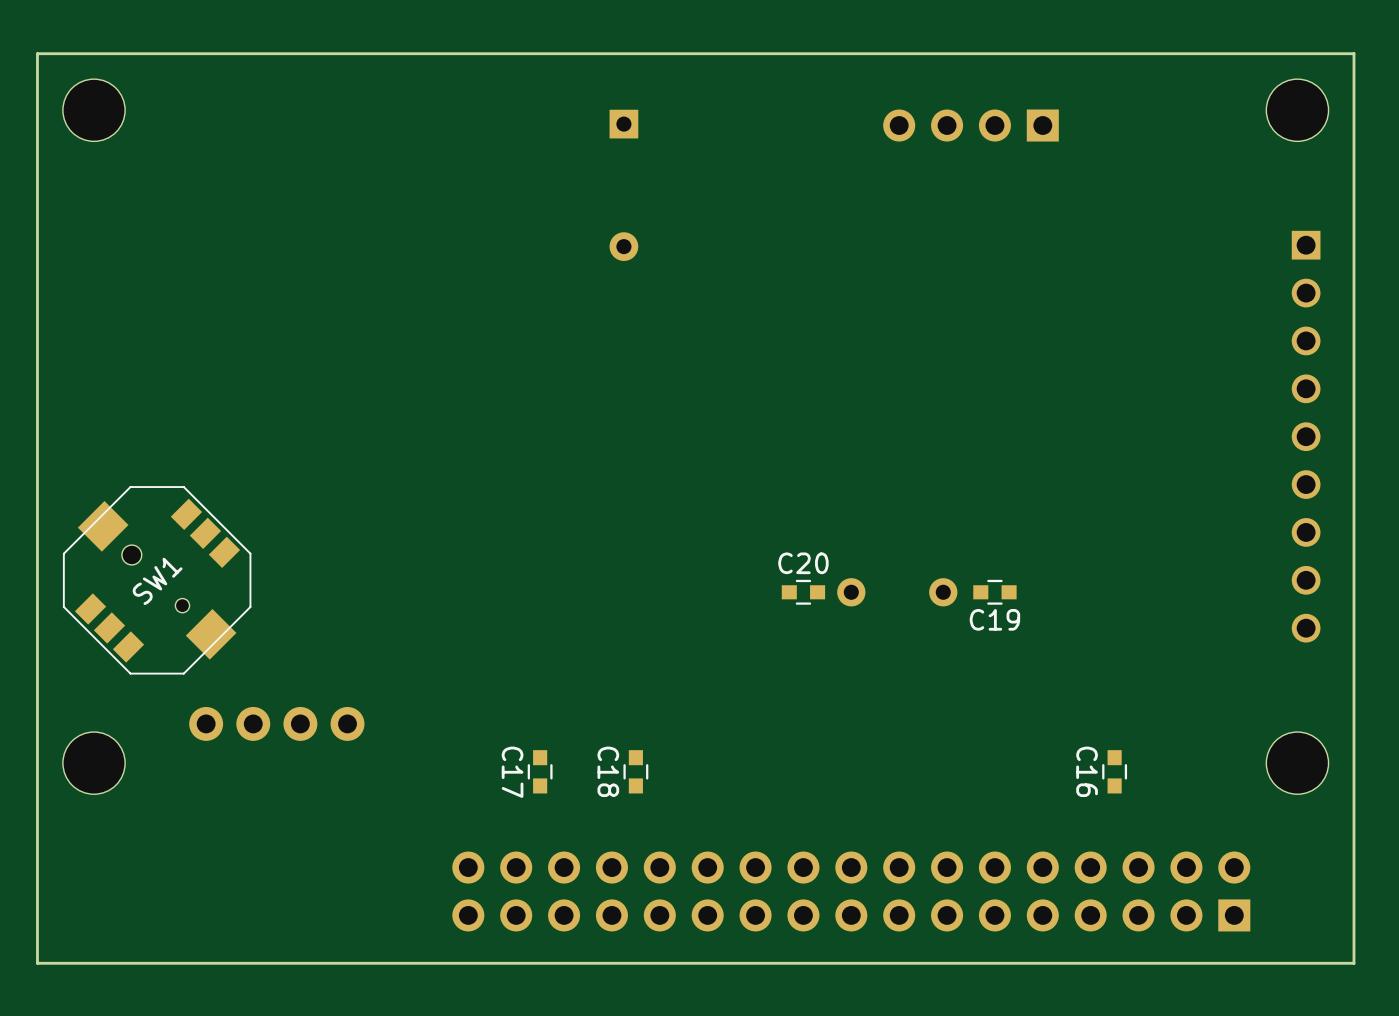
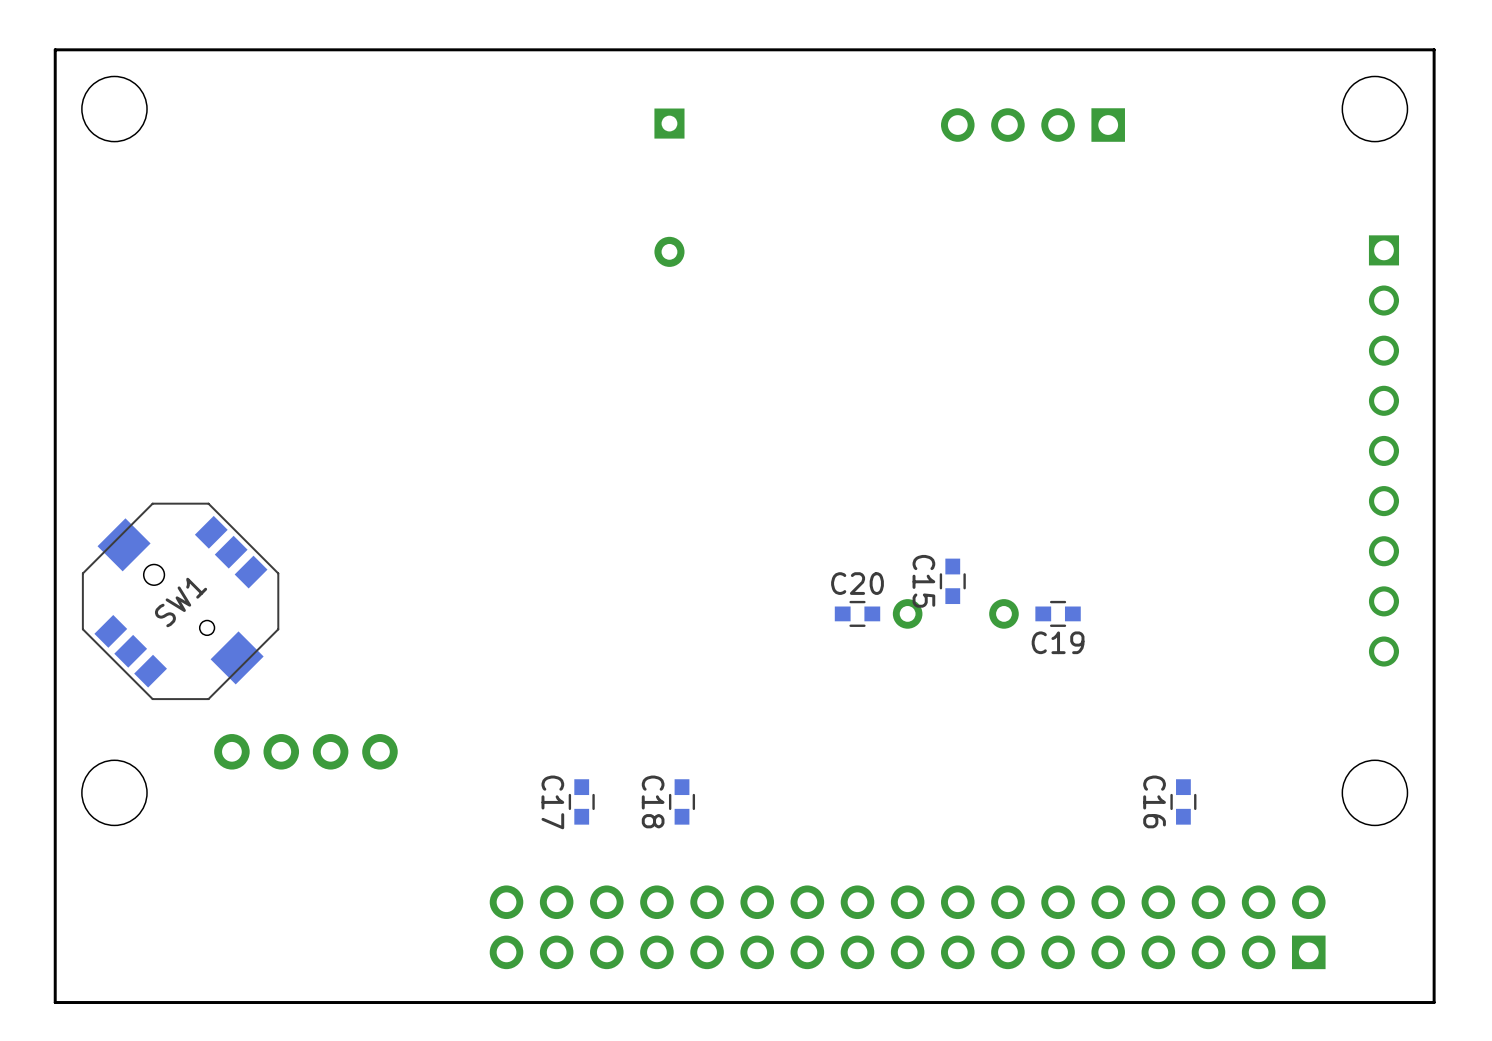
C15: none -> (952, 581)

